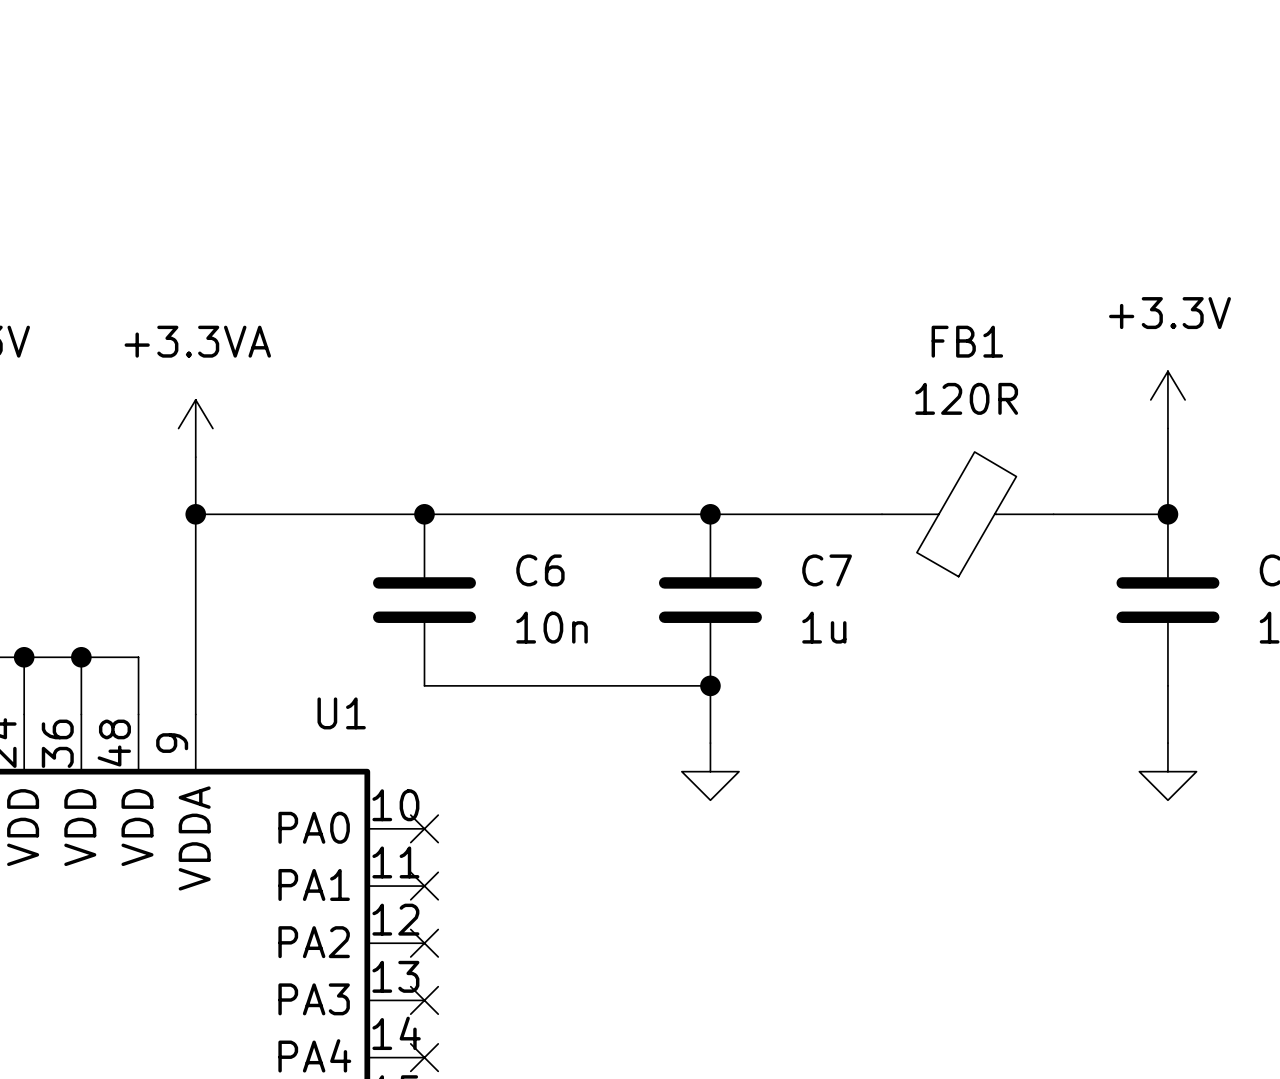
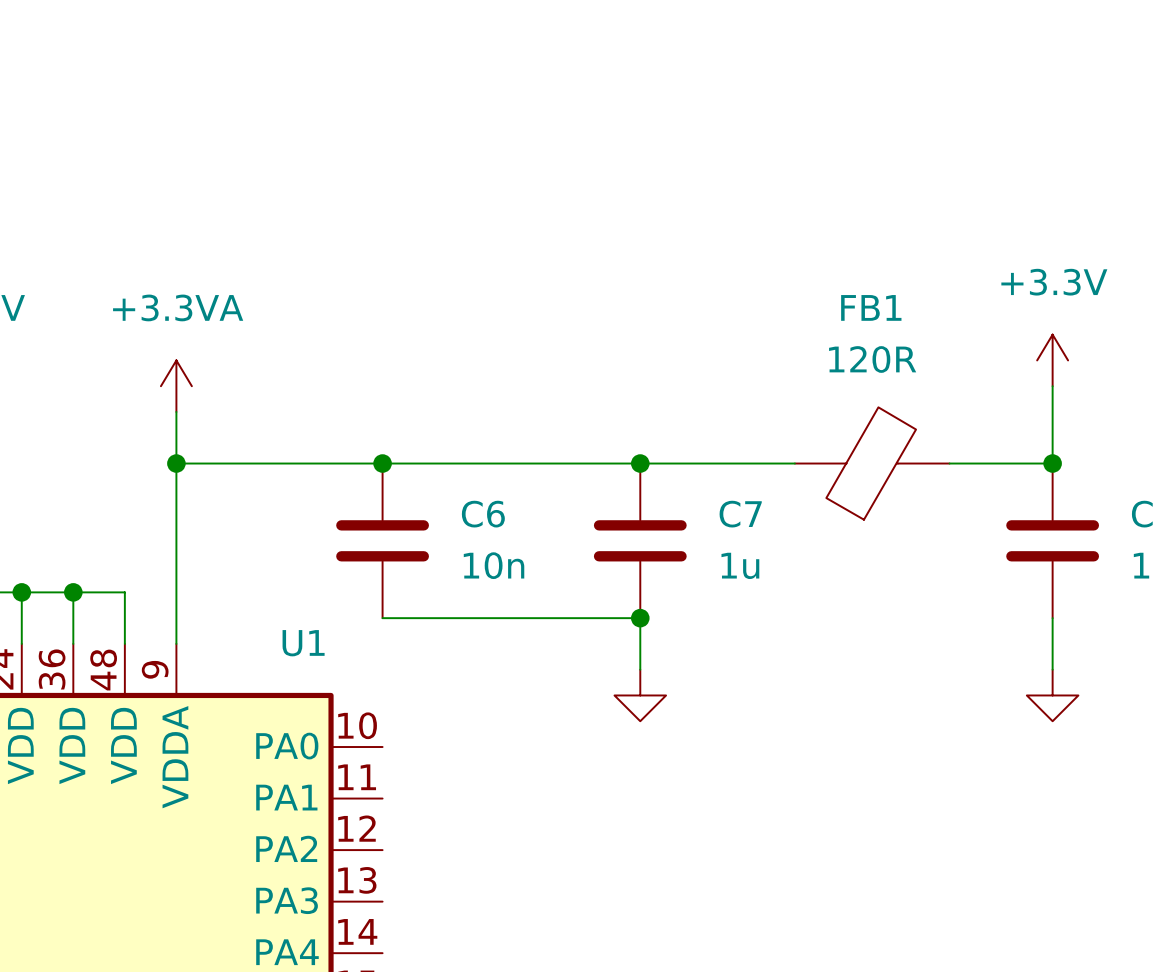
no-connect mark: (424, 828) -> none
no-connect mark: (424, 886) -> none
no-connect mark: (424, 943) -> none
no-connect mark: (424, 1000) -> none
no-connect mark: (424, 1057) -> none

